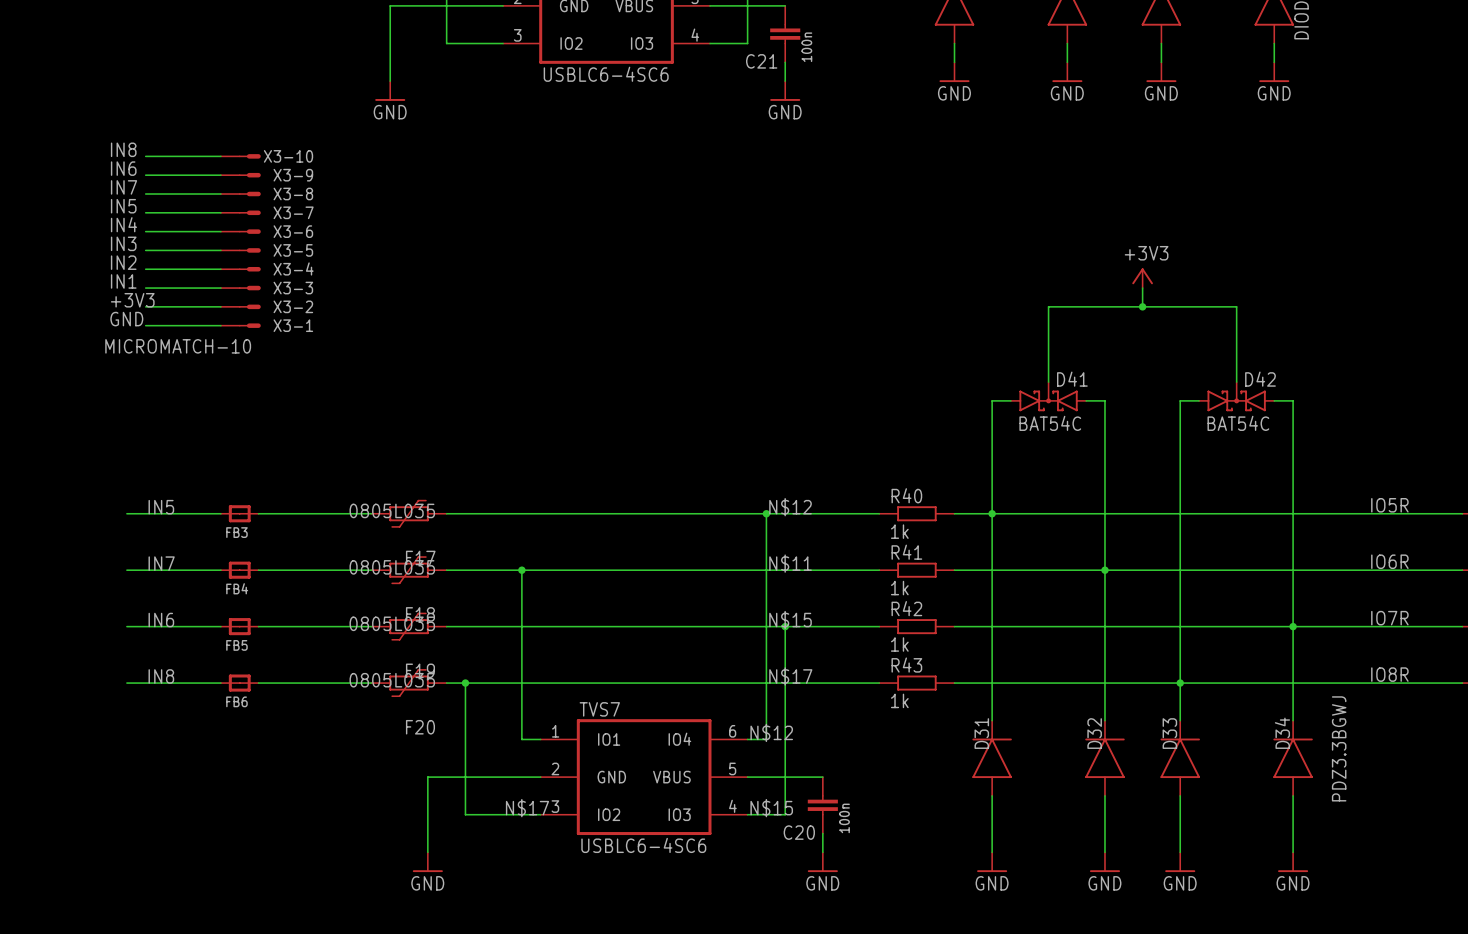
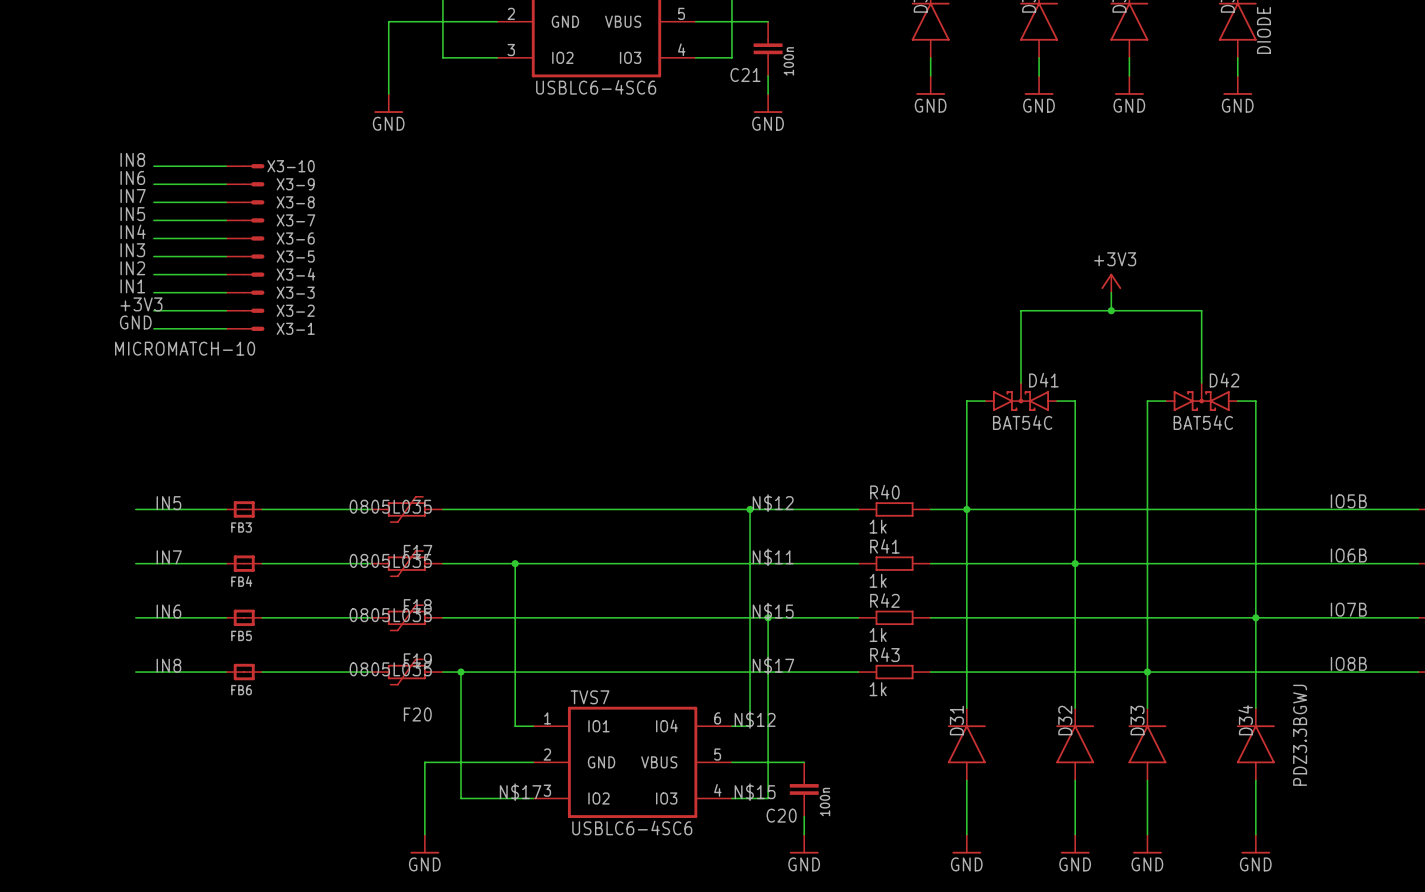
label: IO5R (1389, 505) -> IO5B (1348, 501)
label: IO6R (1389, 561) -> IO6B (1348, 555)
label: IO7R (1389, 618) -> IO7B (1348, 609)
label: IO8R (1389, 674) -> IO8B (1348, 663)

